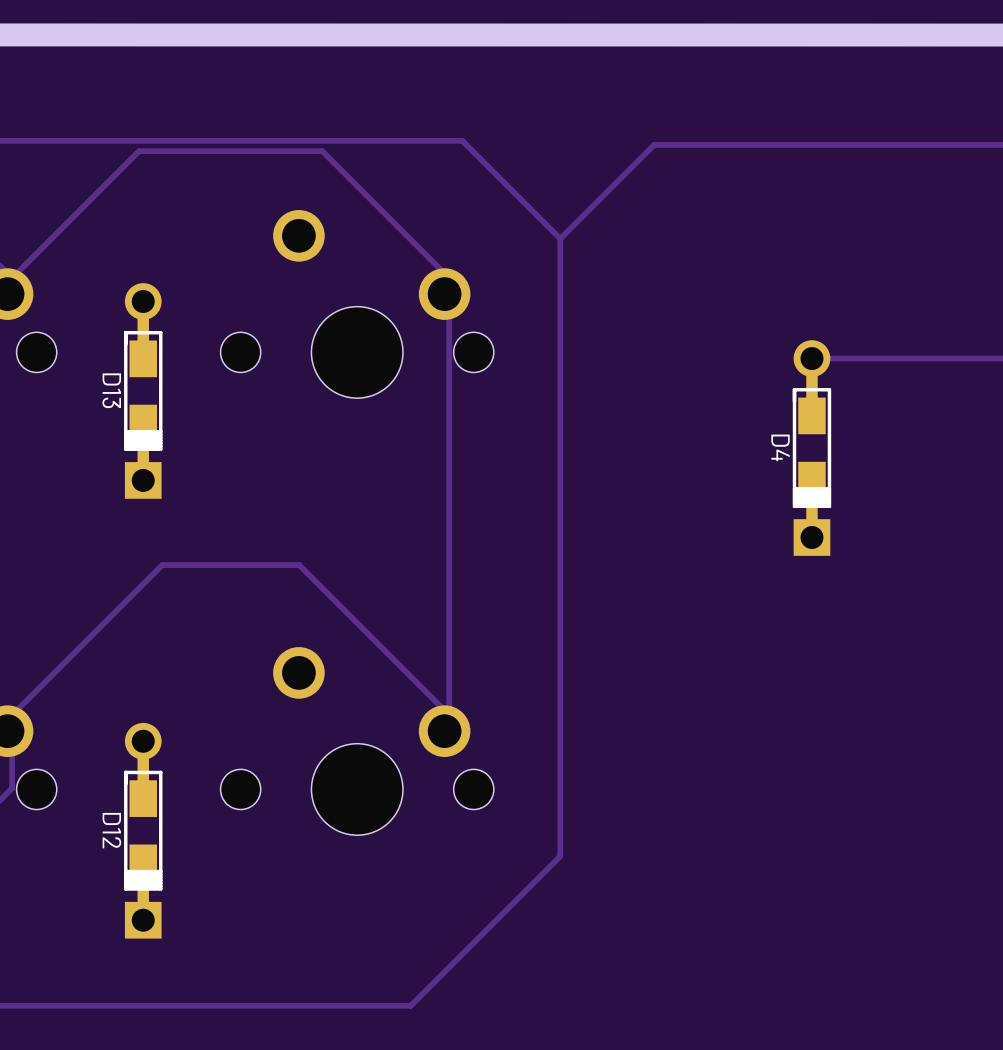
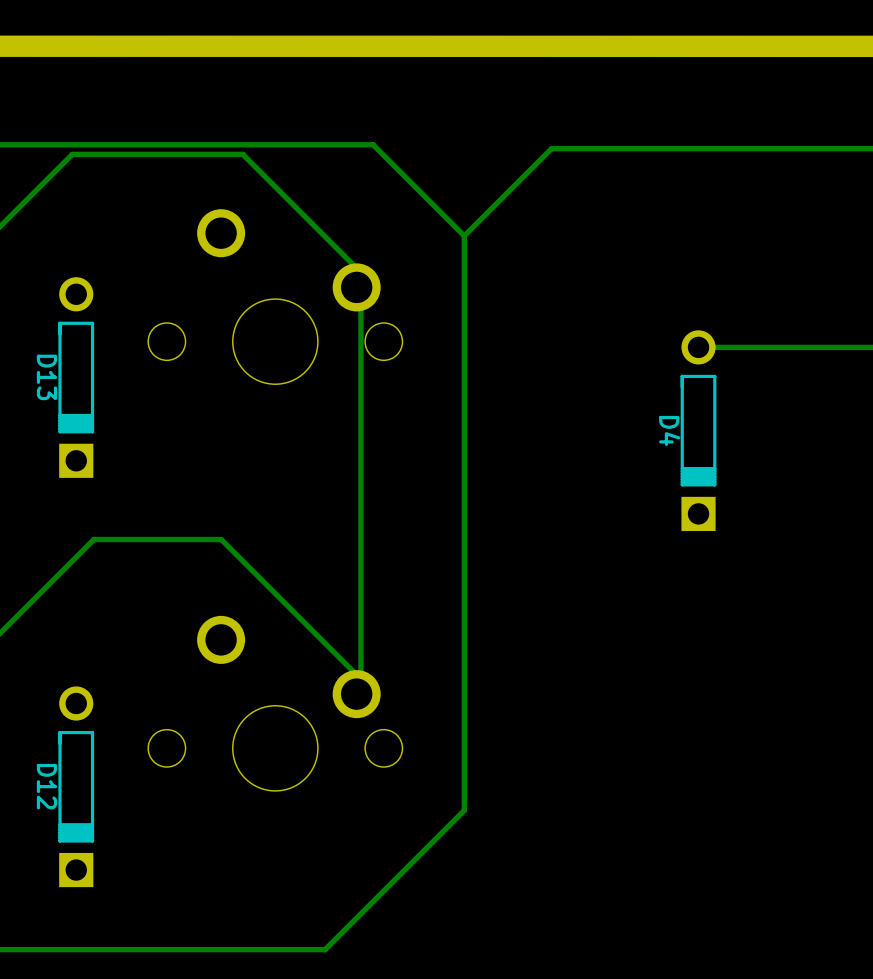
D13 footprint: [124, 283, 163, 499] -> [58, 277, 95, 478]
D4 footprint: [792, 340, 832, 556] -> [680, 330, 717, 531]
D12 footprint: [124, 722, 163, 939] -> [58, 686, 95, 888]

